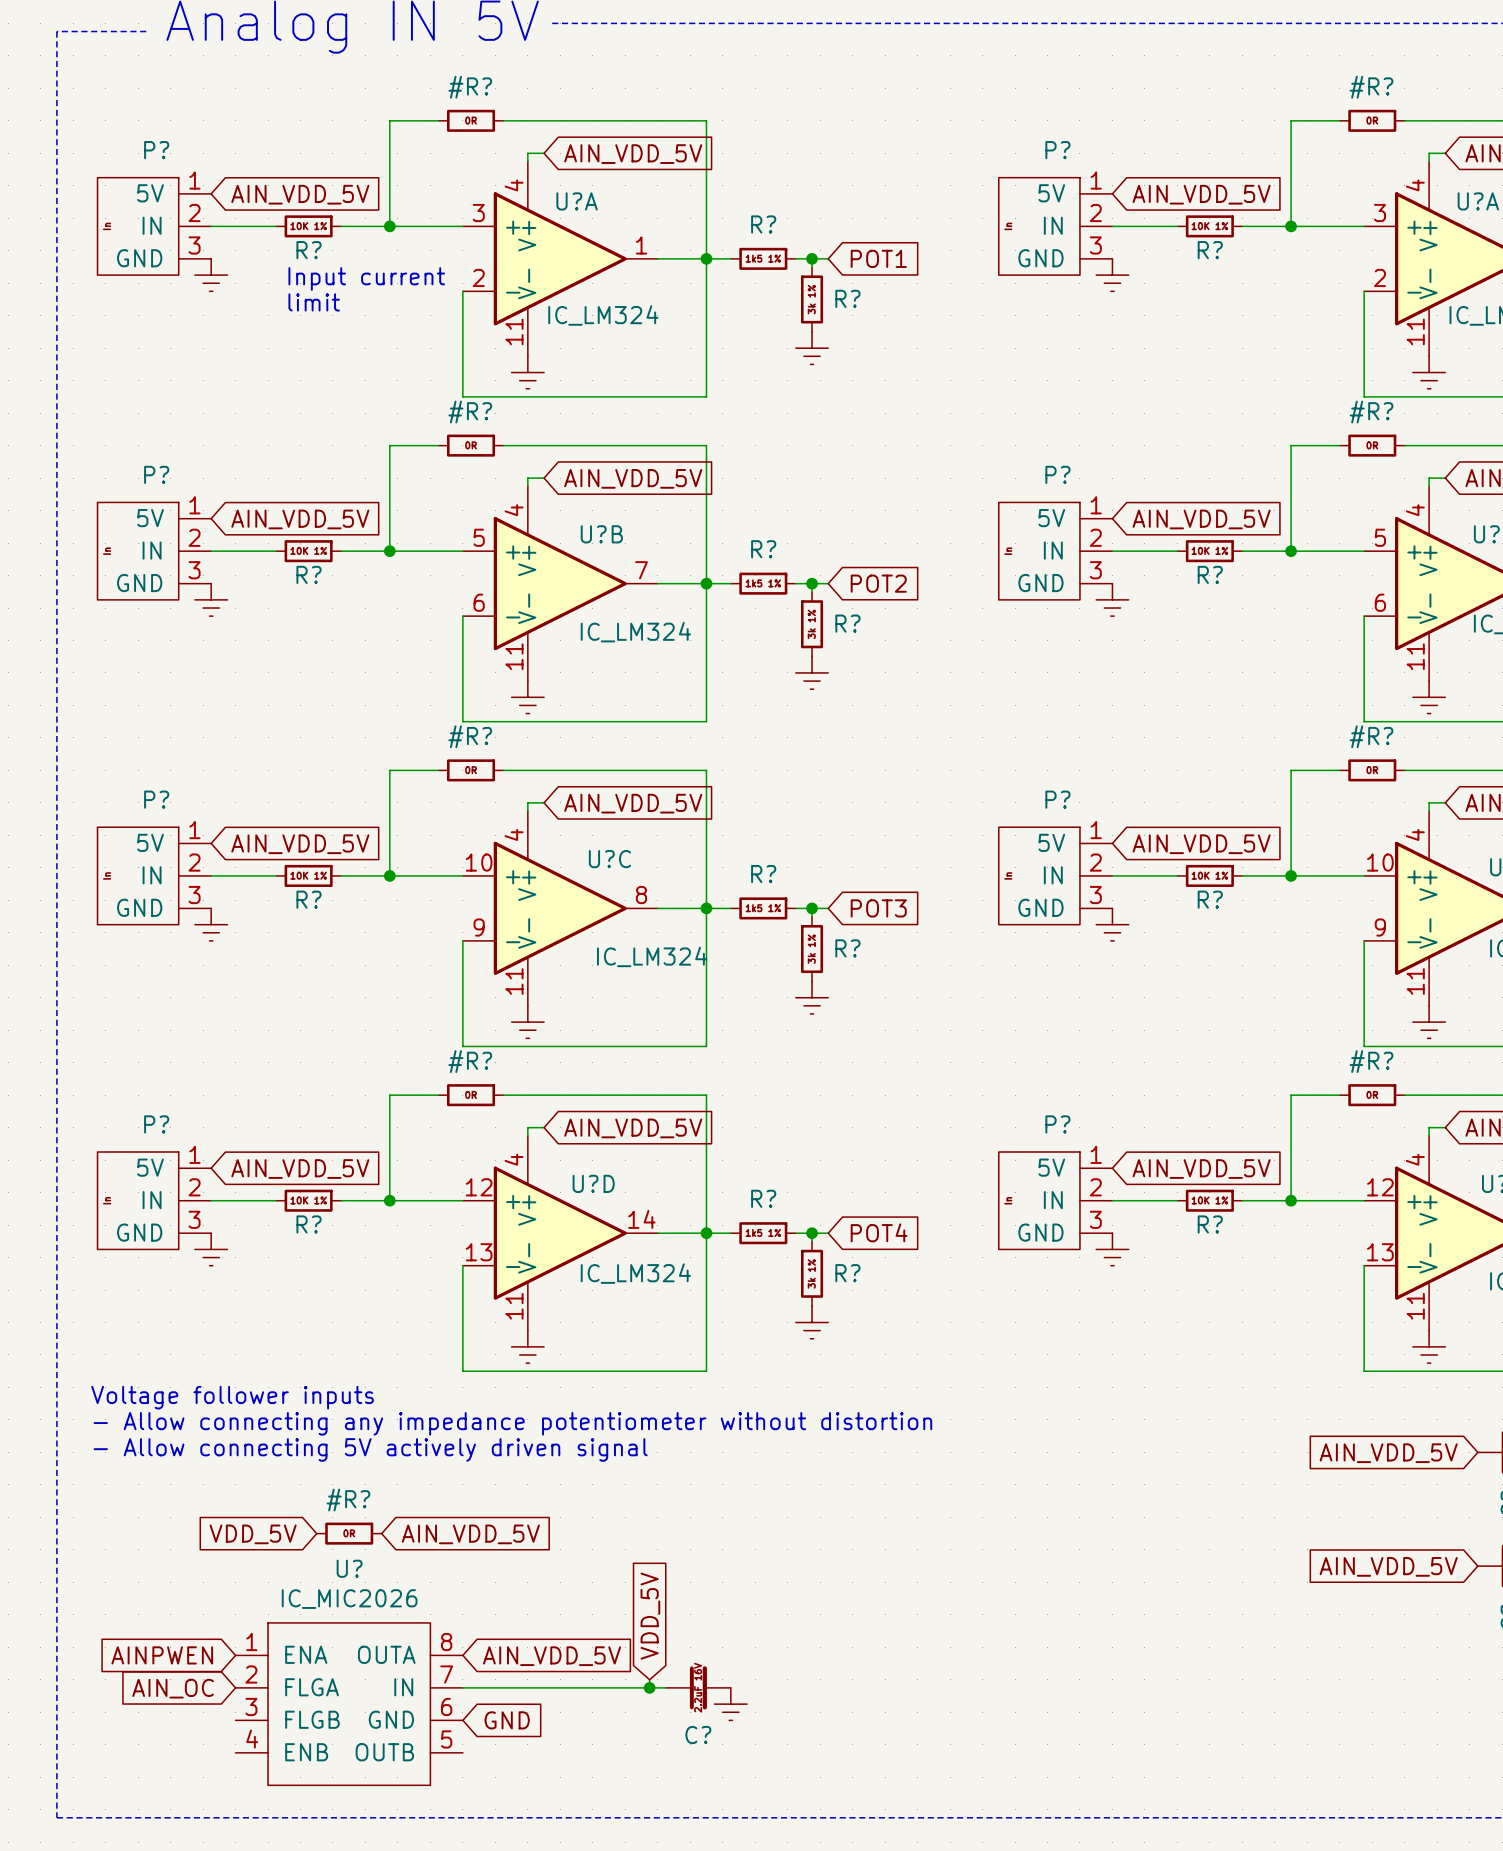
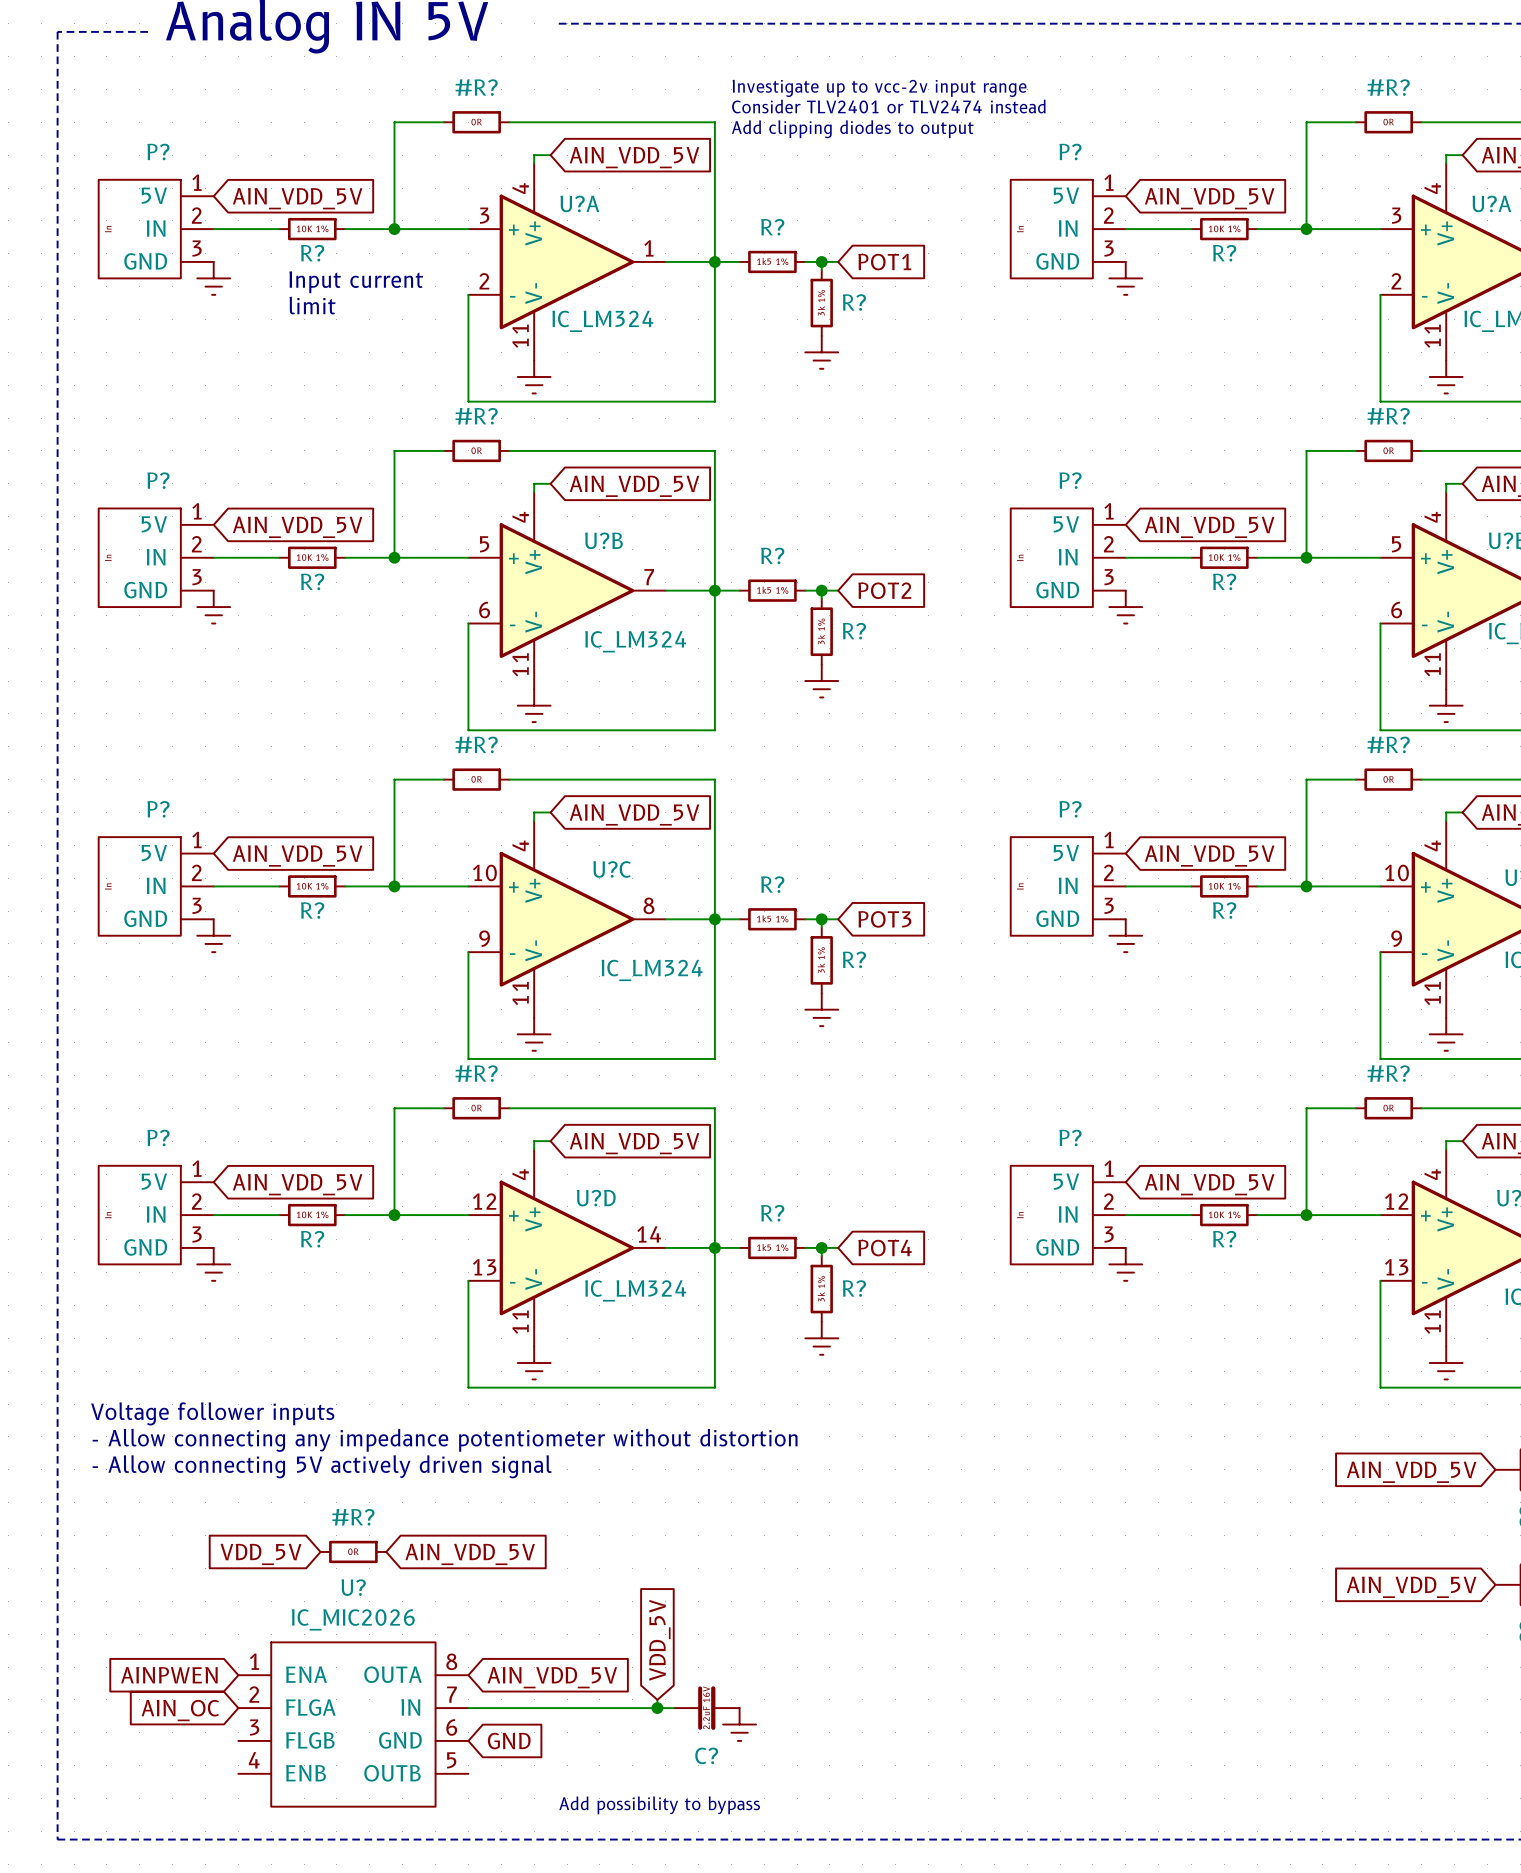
text: none -> Investigate up to vcc-2v input range (879, 88)
text: none -> Consider TLV2401 or TLV2474 instead (888, 106)
text: none -> Add clipping diodes to output (852, 129)
text: none -> Add possibility to bypass (659, 1805)

